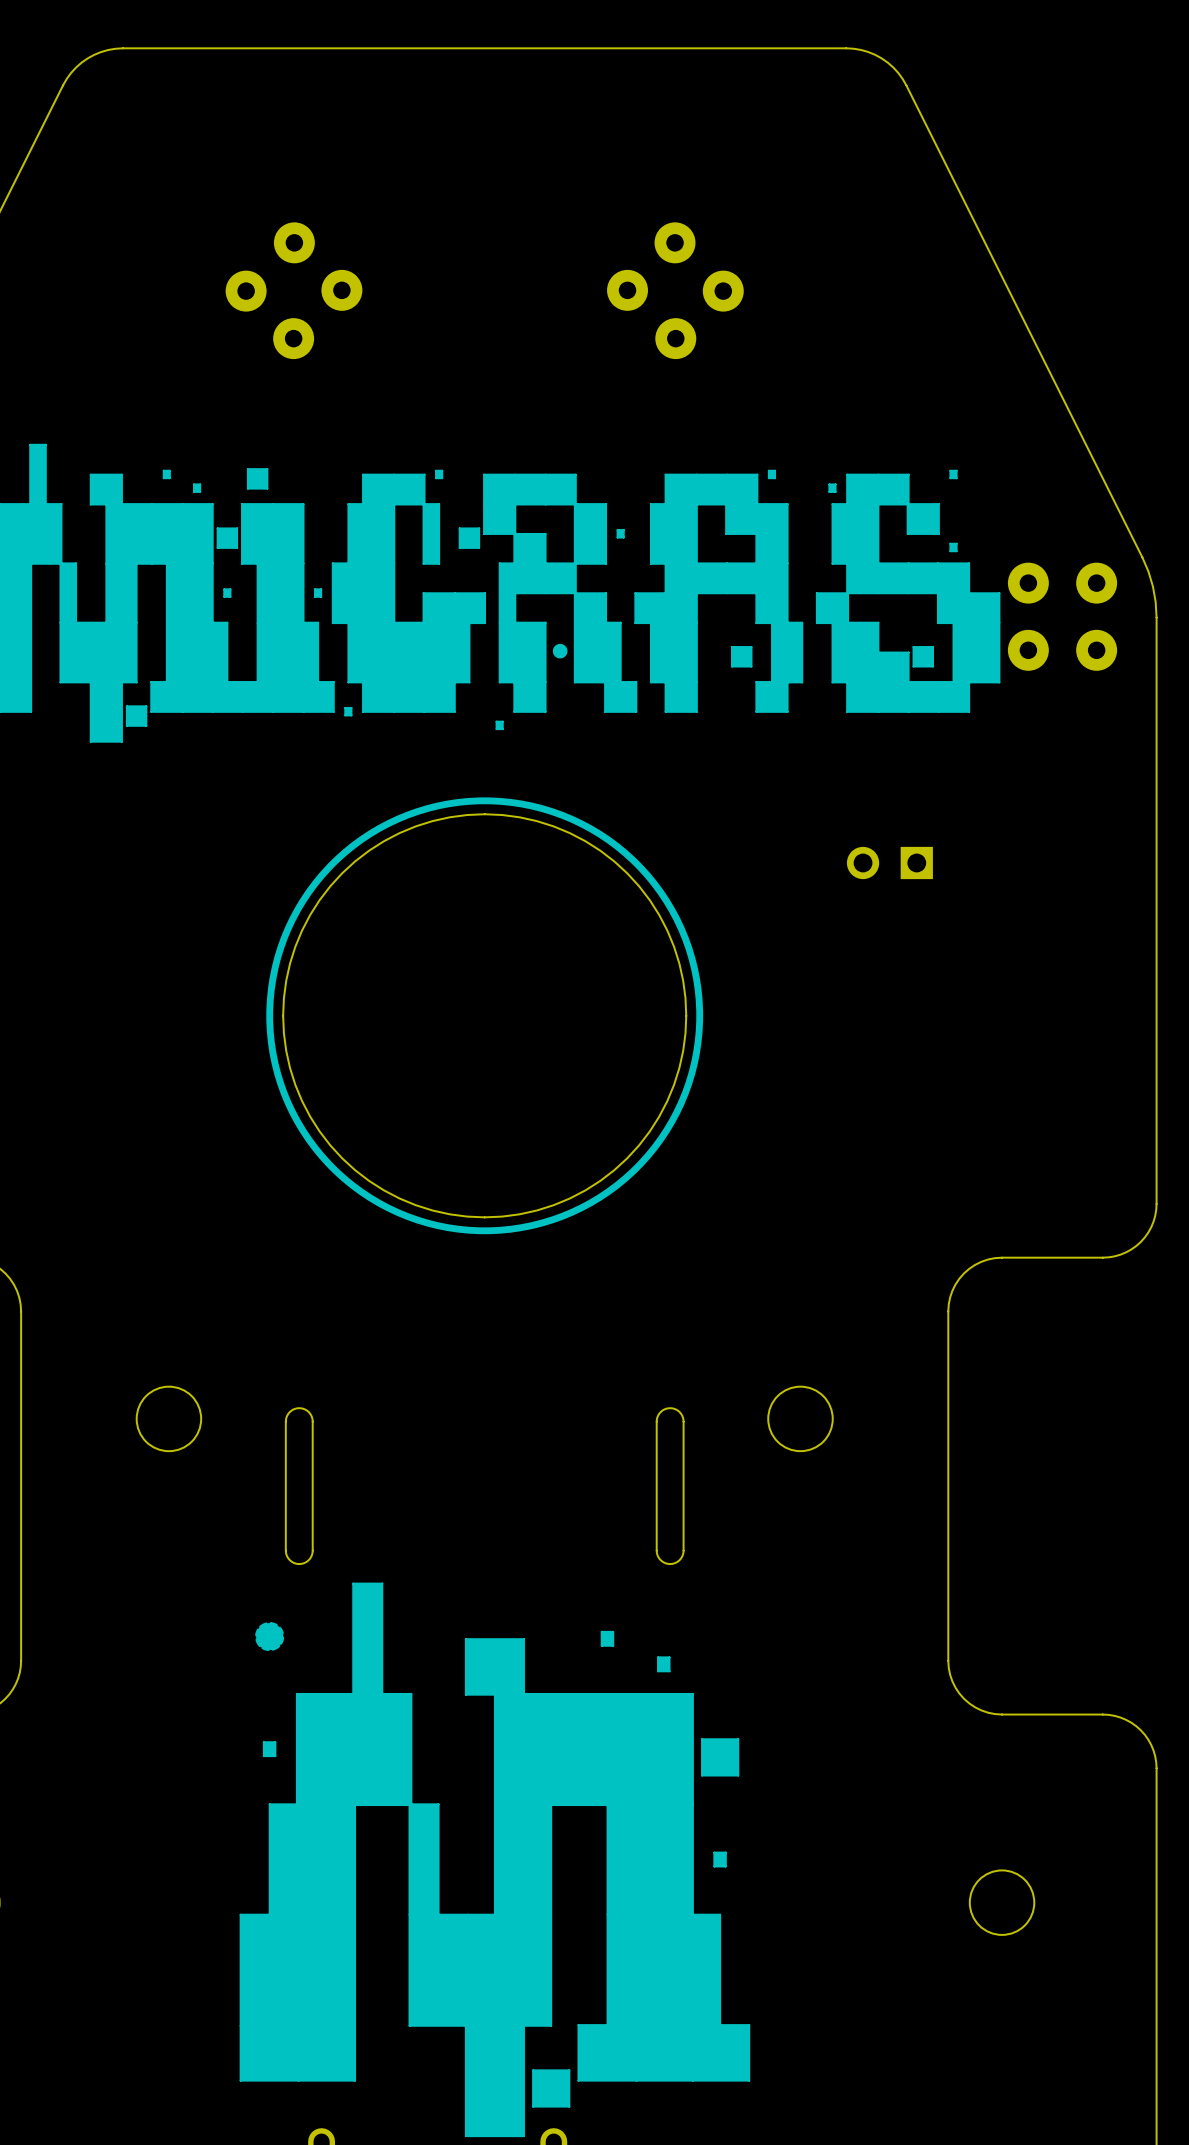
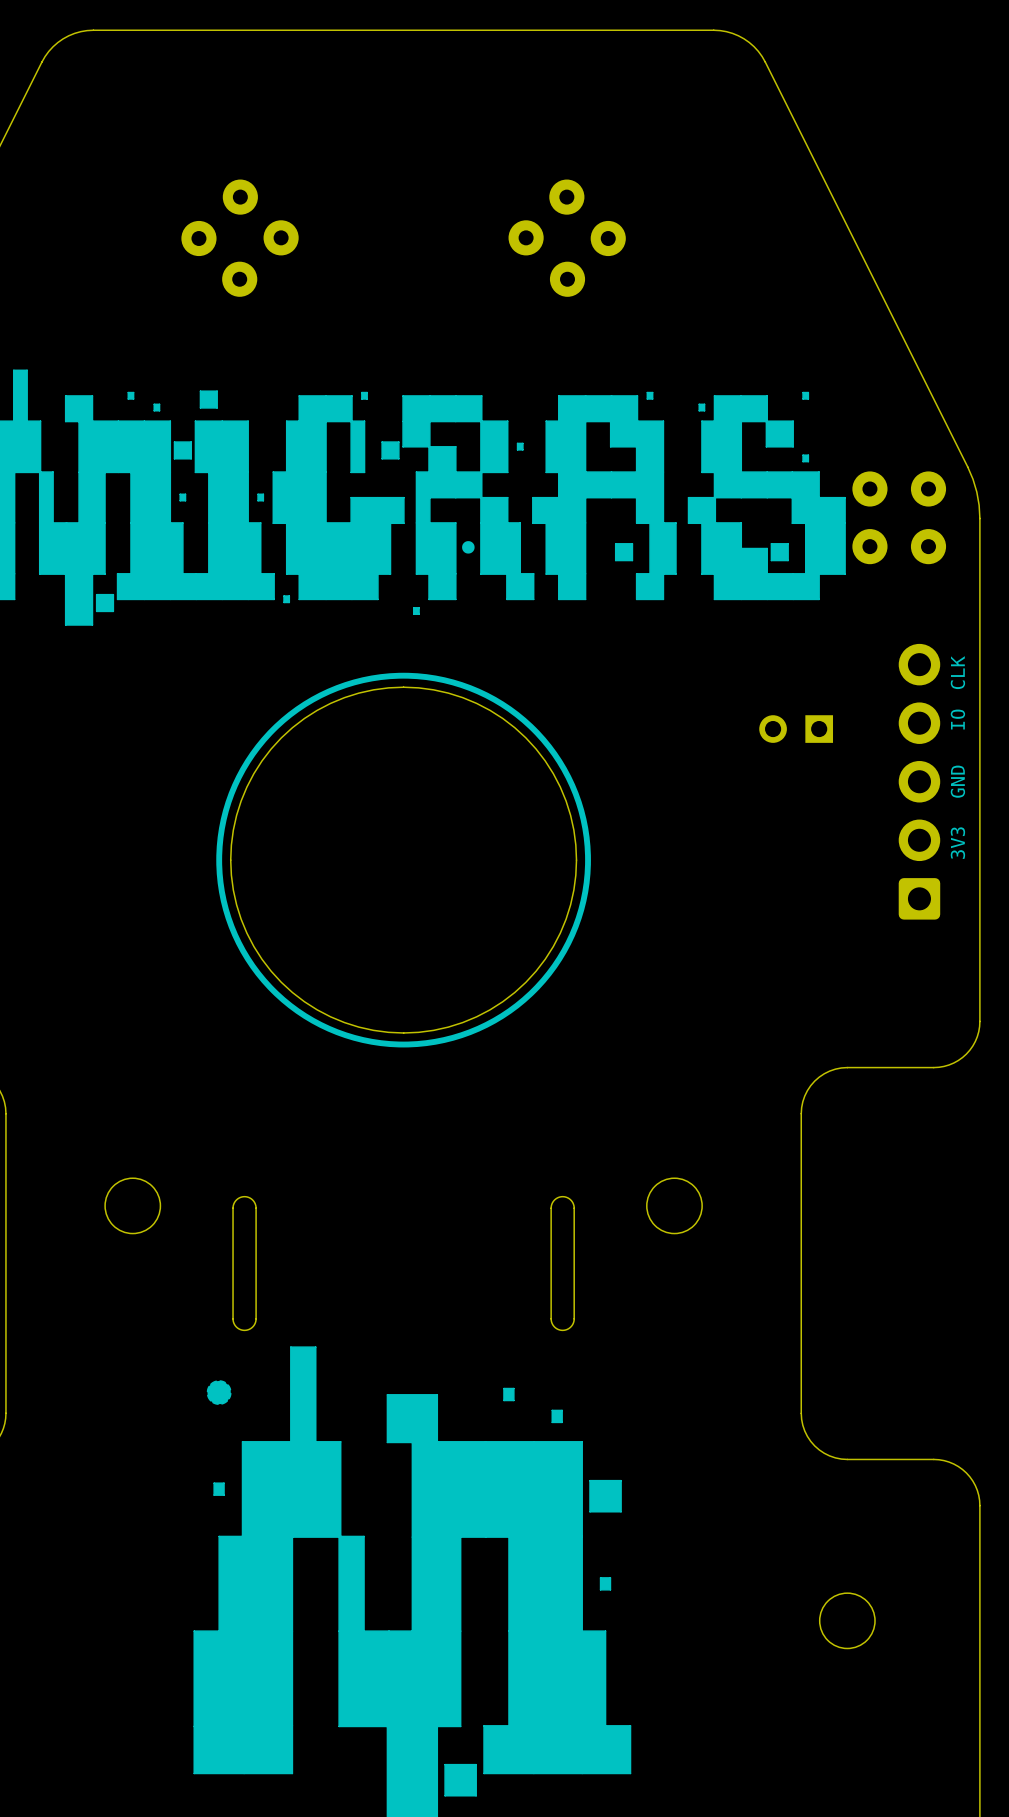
text: none -> CLK (957, 672)
text: none -> IO (957, 719)
part position: (889, 863) -> (796, 729)
text: none -> GND (957, 781)
part: none -> (919, 781)
text: none -> 3V3 (957, 843)

